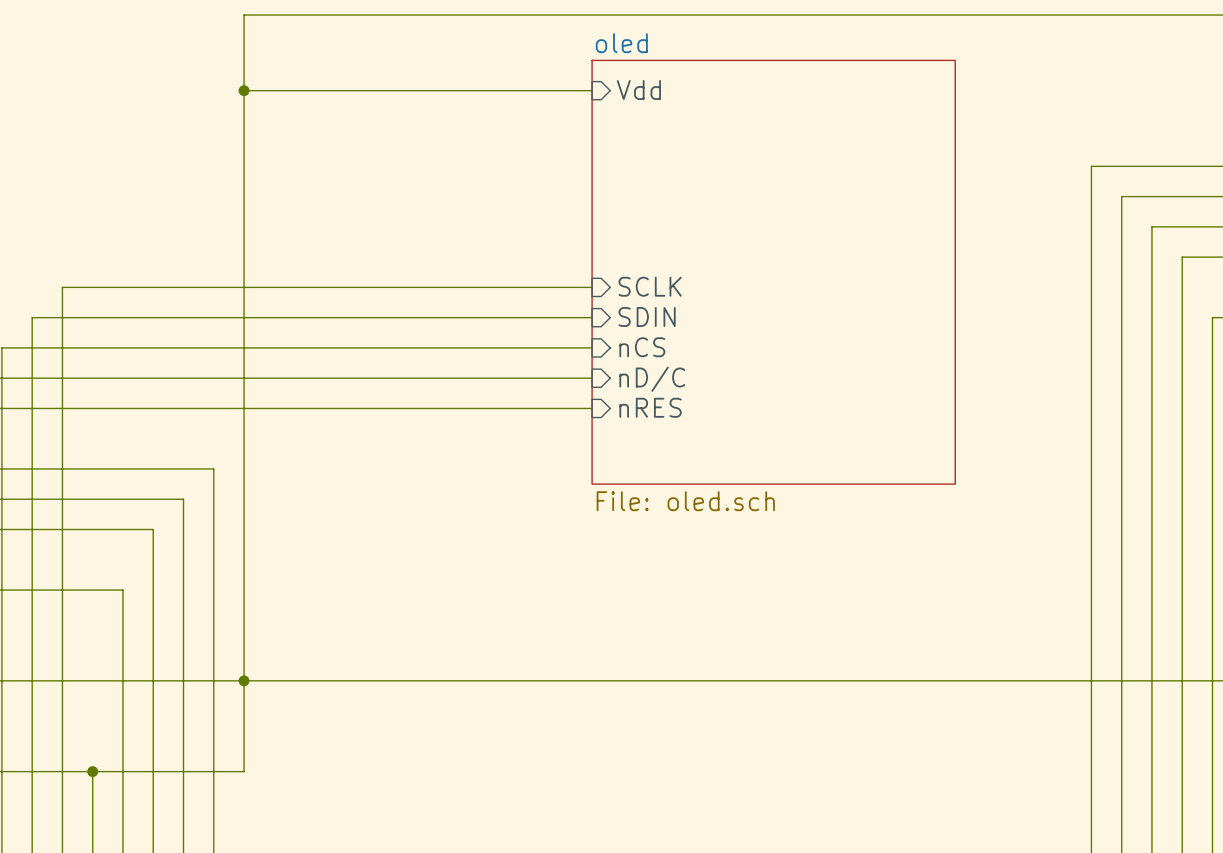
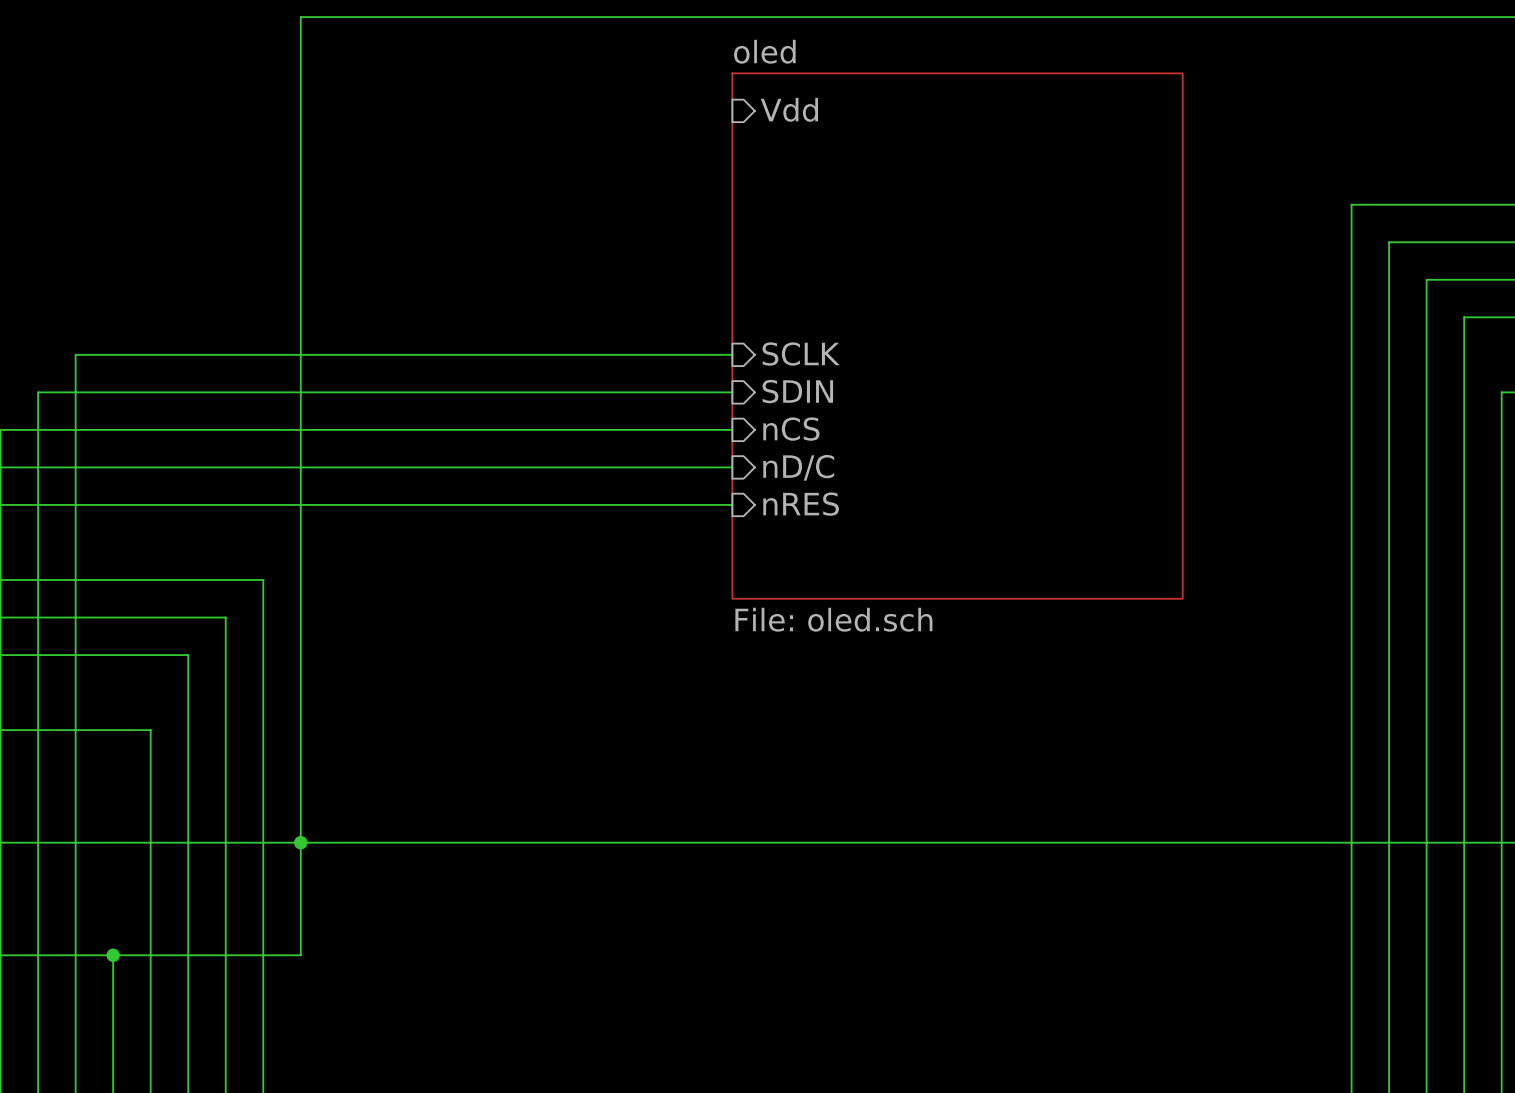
wire: (244, 90) (592, 90) -> none
junction: (244, 90) -> none

